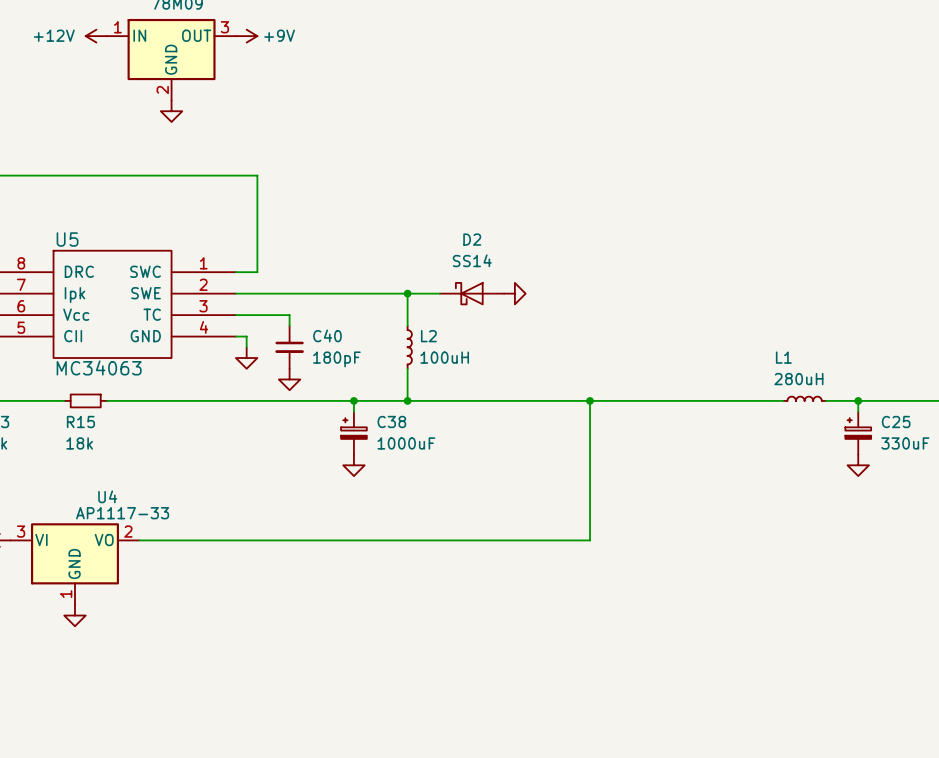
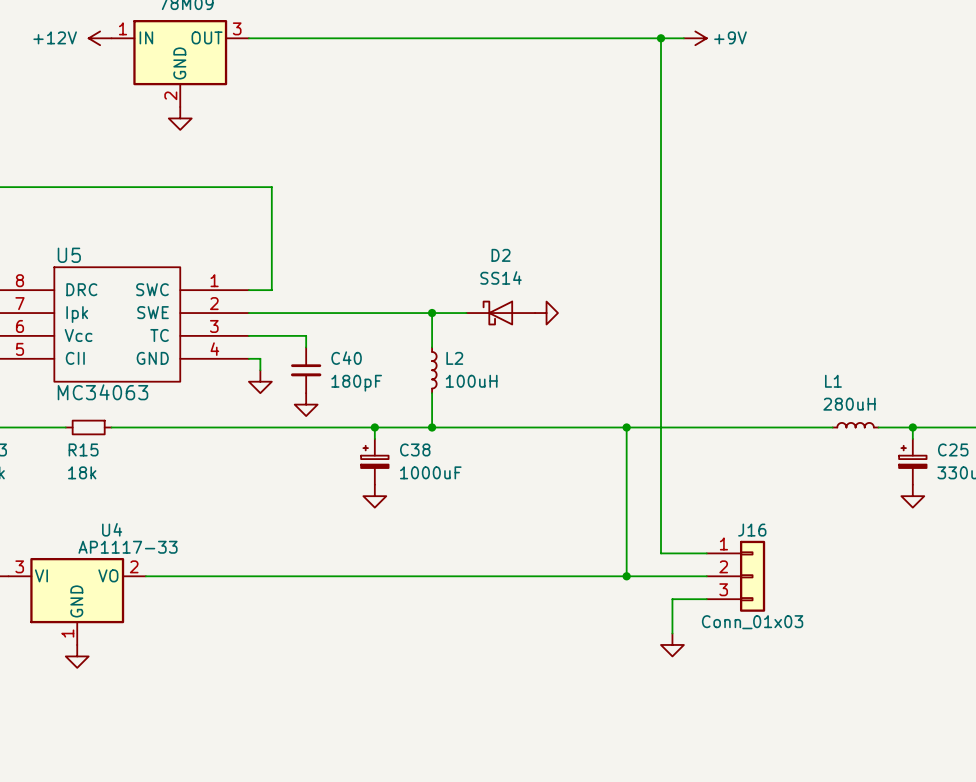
wire: none -> (248, 38) (683, 38)
power symbol: +9V (246, 36) -> none
wire: none -> (661, 38) (661, 553) (706, 553)
junction: none -> (661, 38)
power symbol: none -> +9V (695, 38)
wire: none -> (626, 576) (706, 576)
junction: none -> (626, 576)
J16: none -> Conn_01x03 (735, 576)
wire: none -> (706, 599) (672, 599) (672, 633)
power symbol: none -> (672, 644)

